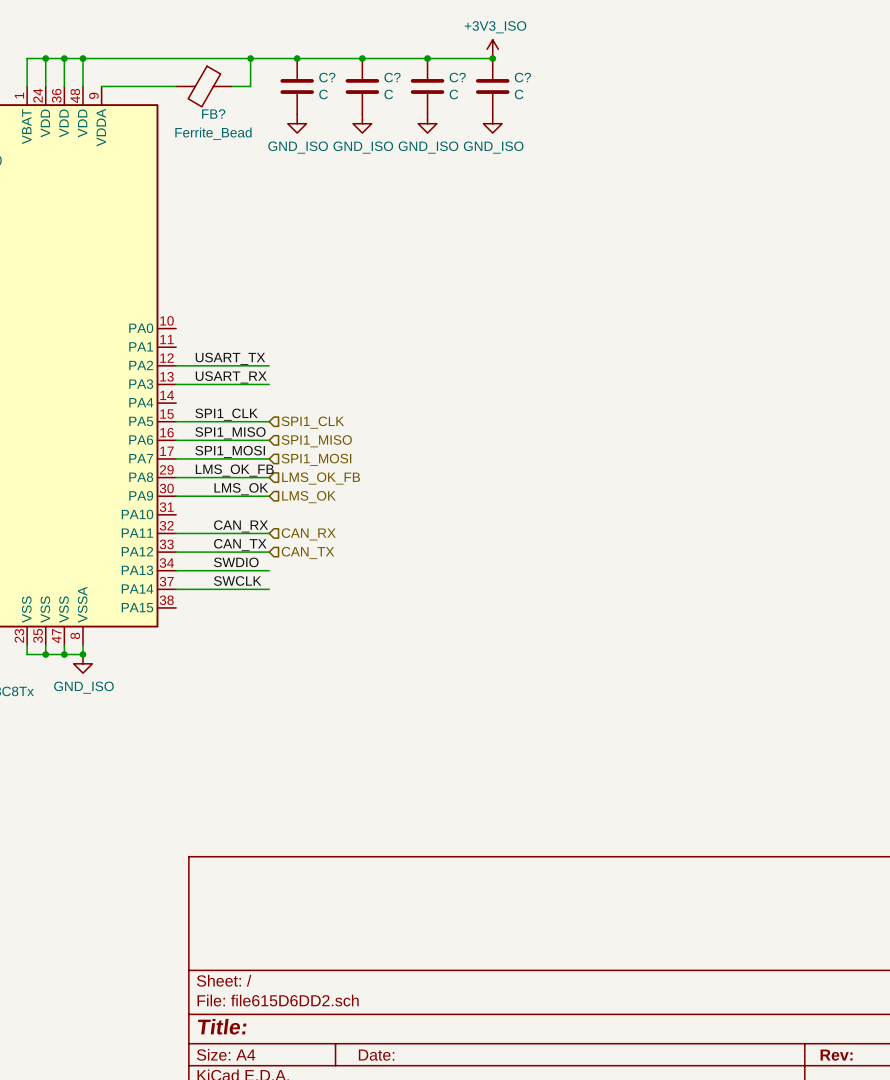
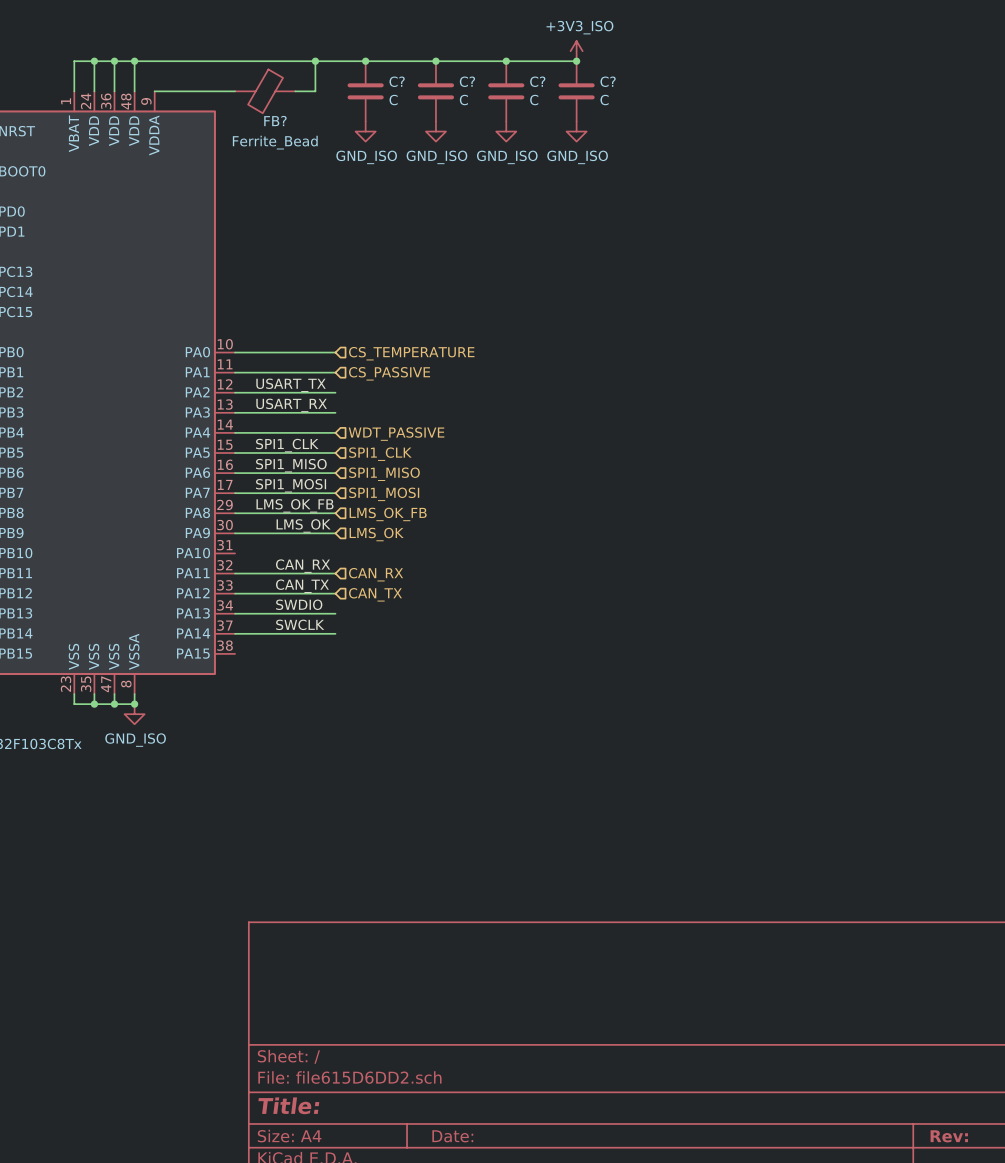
wire: none -> (235, 352) (335, 352)
hierarchical label: none -> CS_TEMPERATURE (411, 353)
wire: none -> (235, 372) (335, 372)
hierarchical label: none -> CS_PASSIVE (389, 373)
wire: none -> (235, 432) (335, 432)
hierarchical label: none -> WDT_PASSIVE (396, 434)

